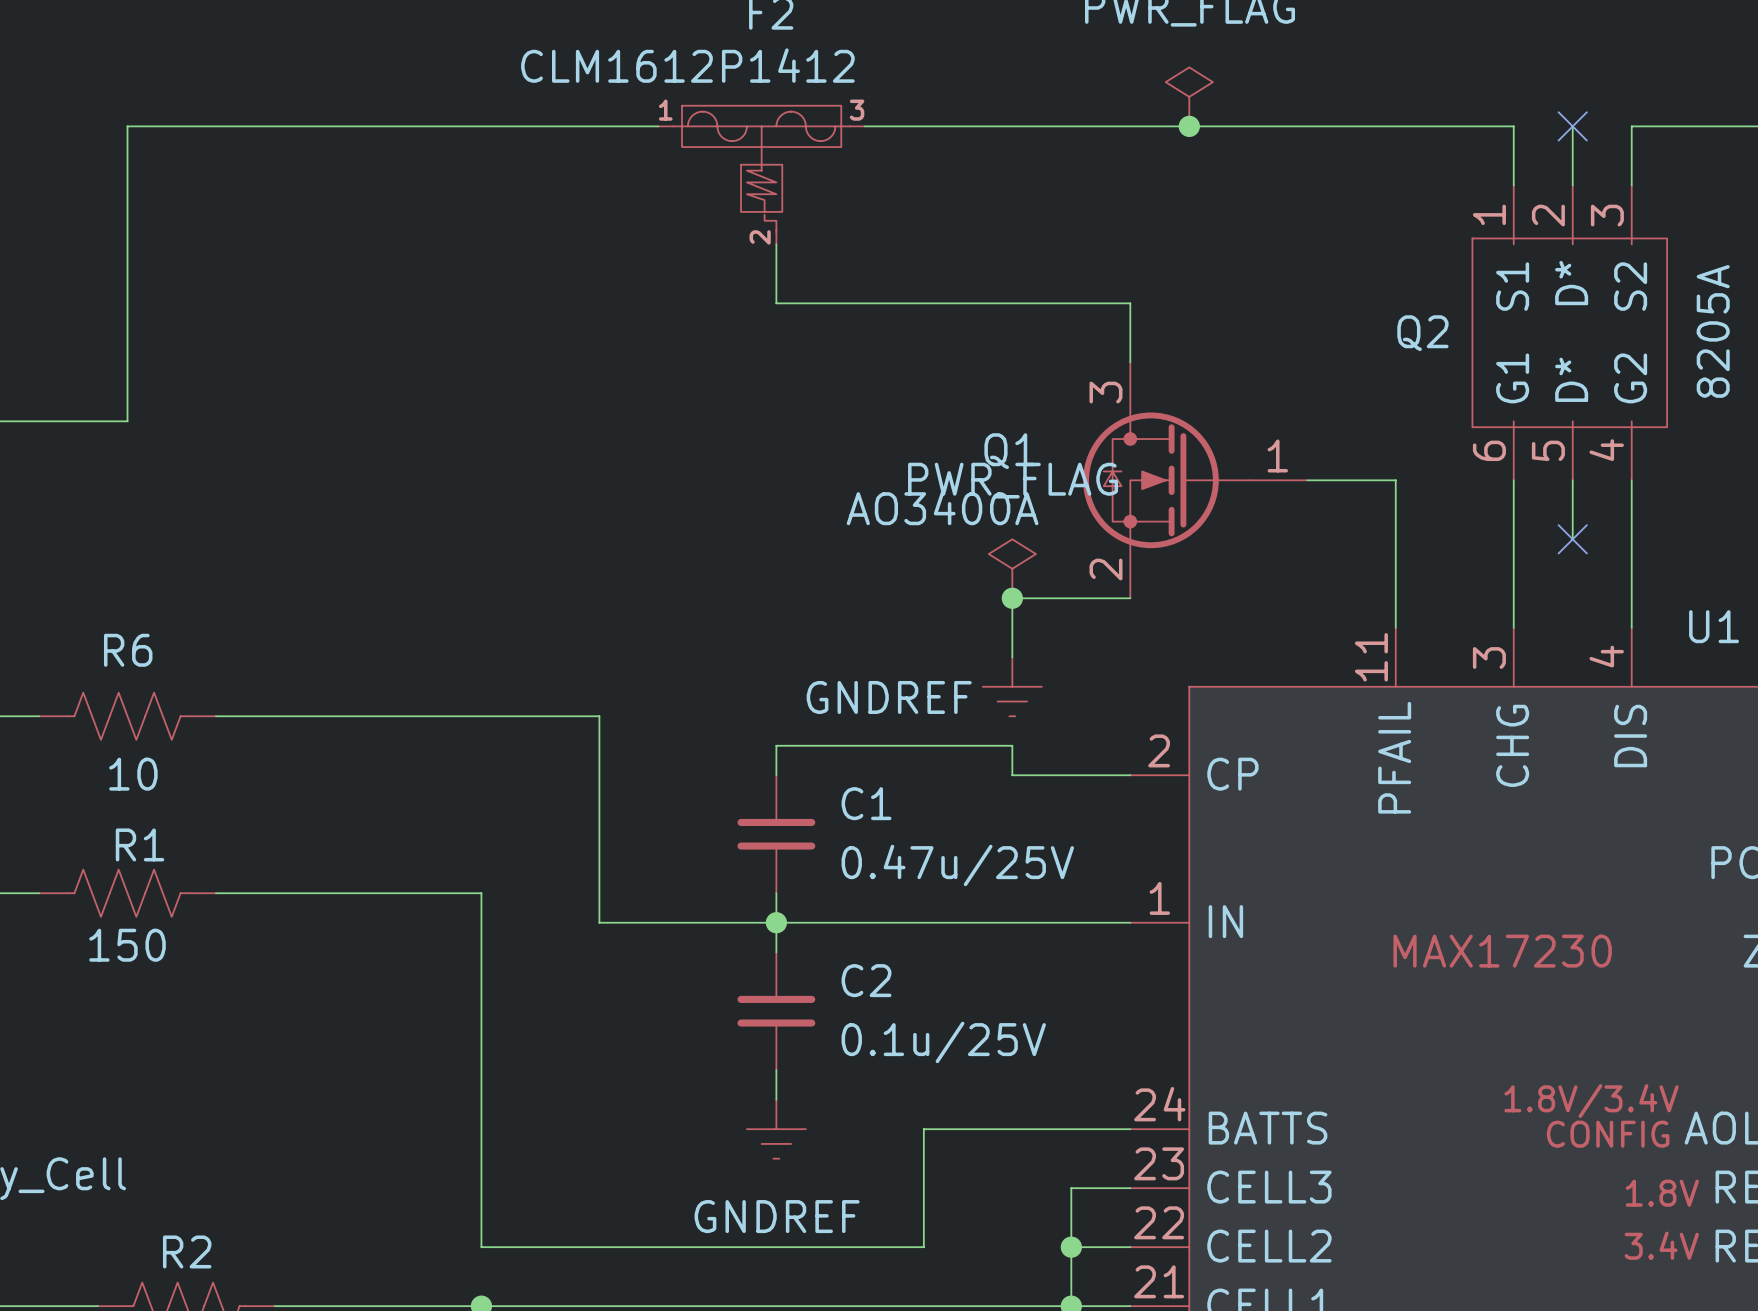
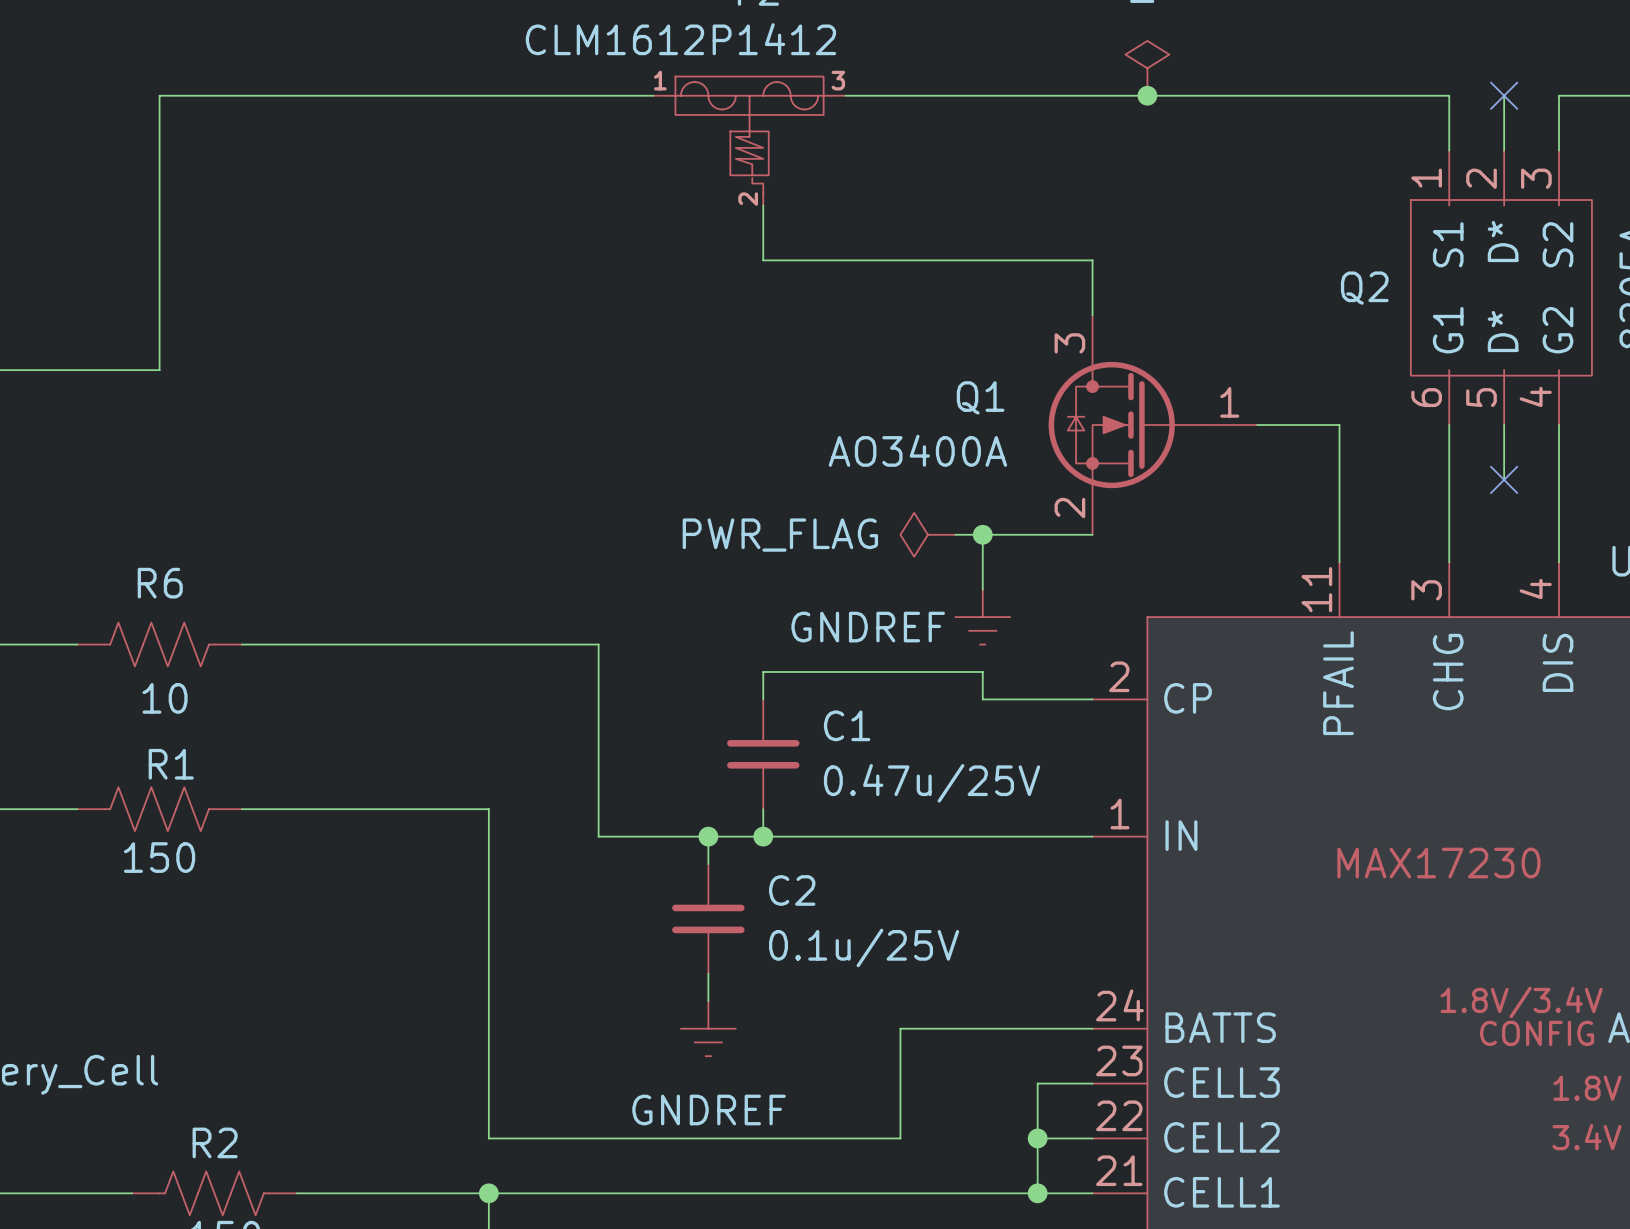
power symbol text position: PWR_FLAG (1013, 480) -> PWR_FLAG (780, 535)
power symbol rotation: 0° (1012, 568) -> 90° counterclockwise (927, 534)
power symbol position: PWR_FLAG (1012, 568) -> PWR_FLAG (927, 534)
wire: none -> (955, 534) (982, 534)
junction: none -> (708, 836)
wire: (776, 922) (776, 952) -> (708, 836) (708, 864)
C2 position: (776, 1011) -> (708, 918)
wire: (776, 1070) (776, 1099) -> (708, 973) (708, 1001)
power symbol position: GNDREF (776, 1129) -> GNDREF (708, 1028)

